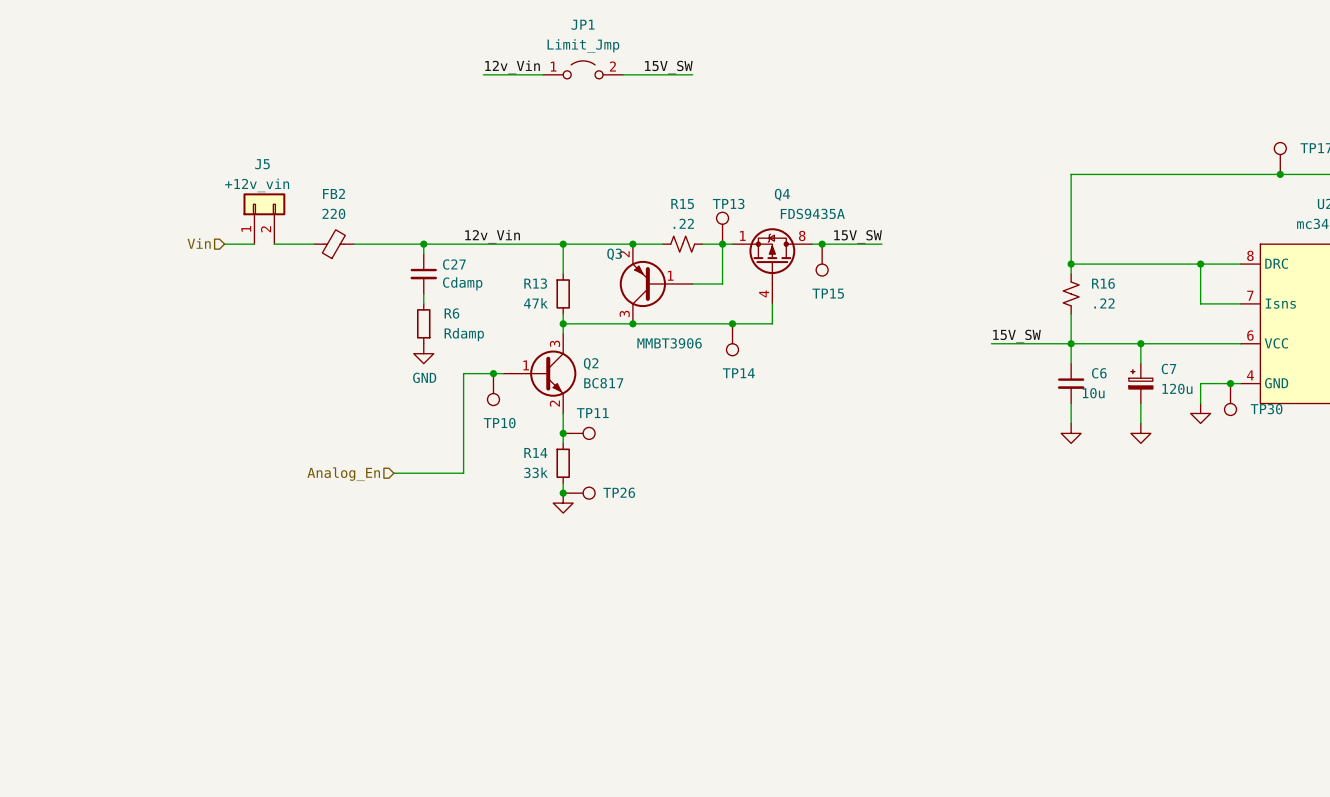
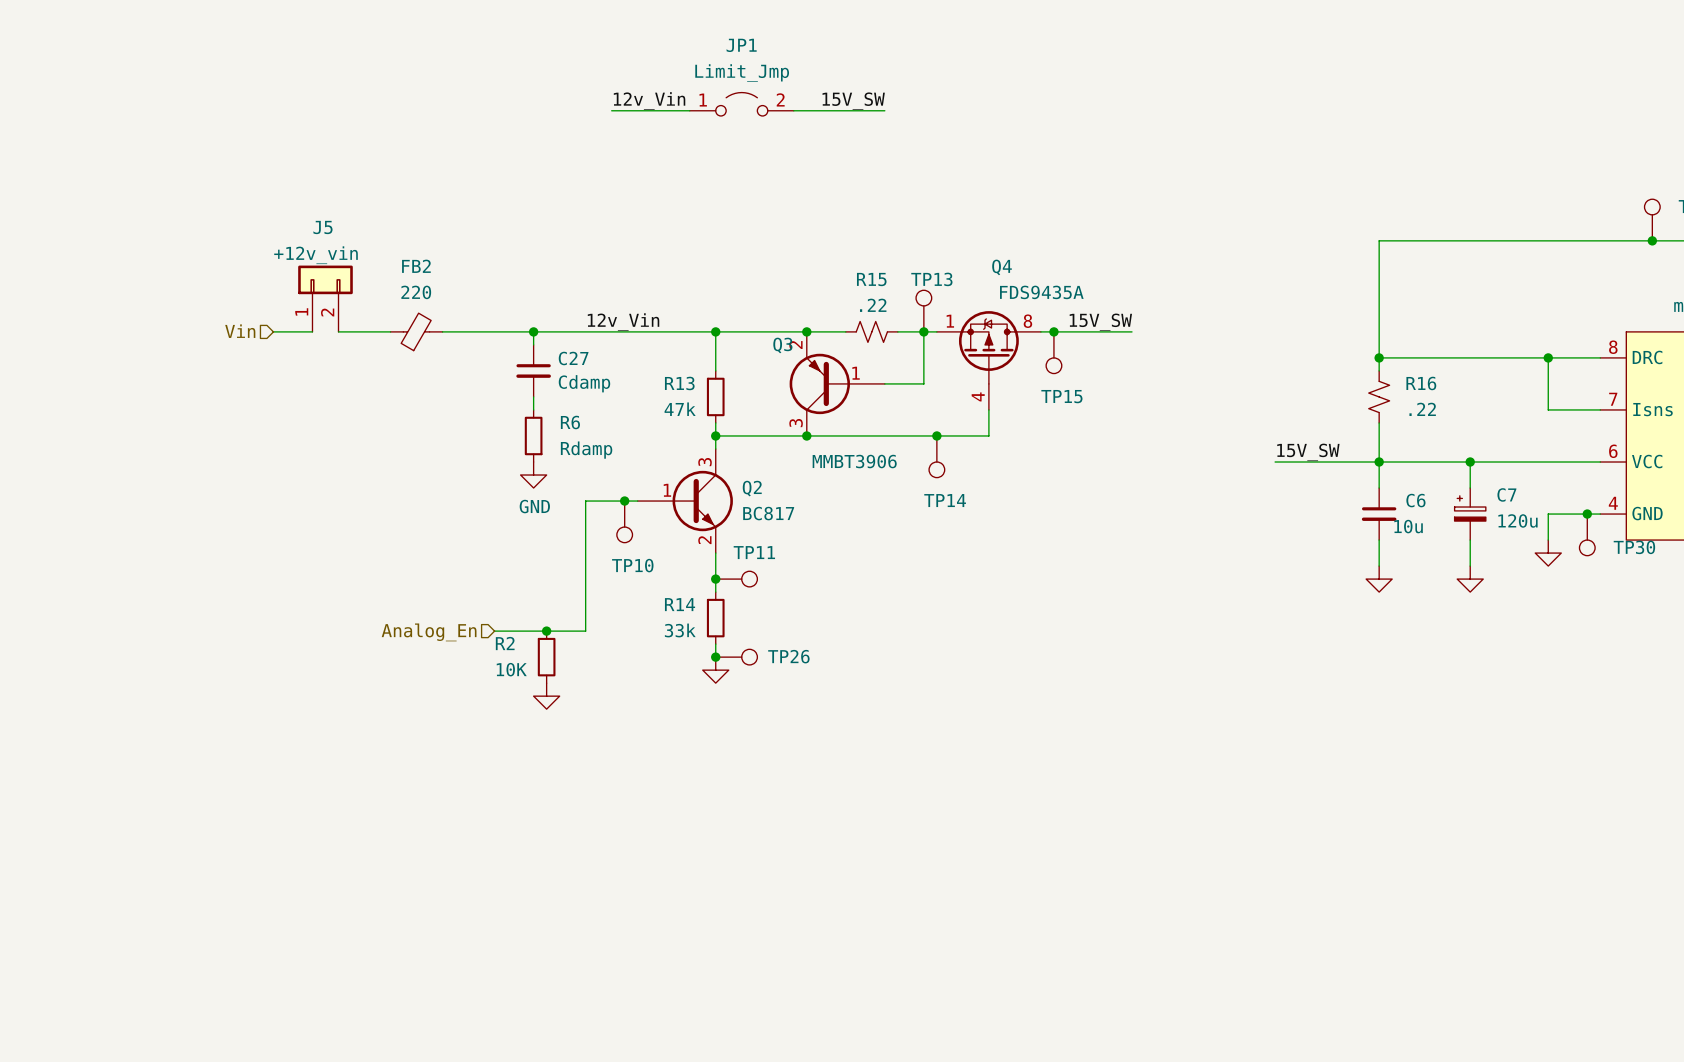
junction: none -> (546, 631)
R2: none -> 10K (546, 657)
power symbol: none -> (546, 696)

